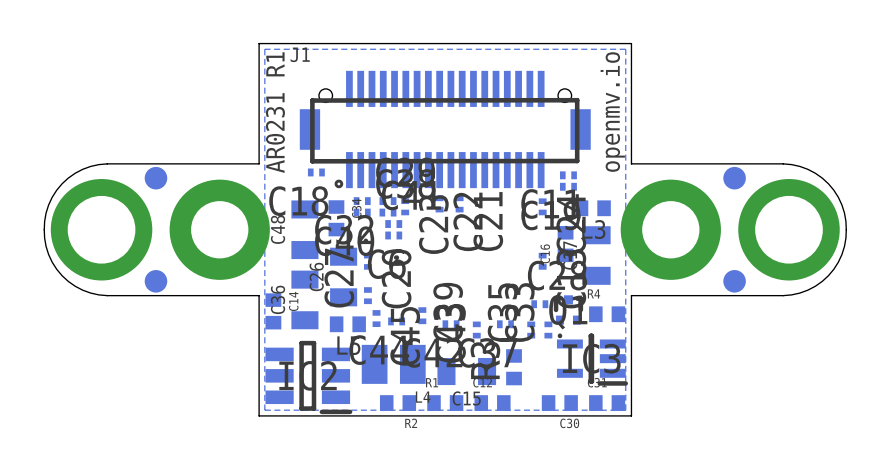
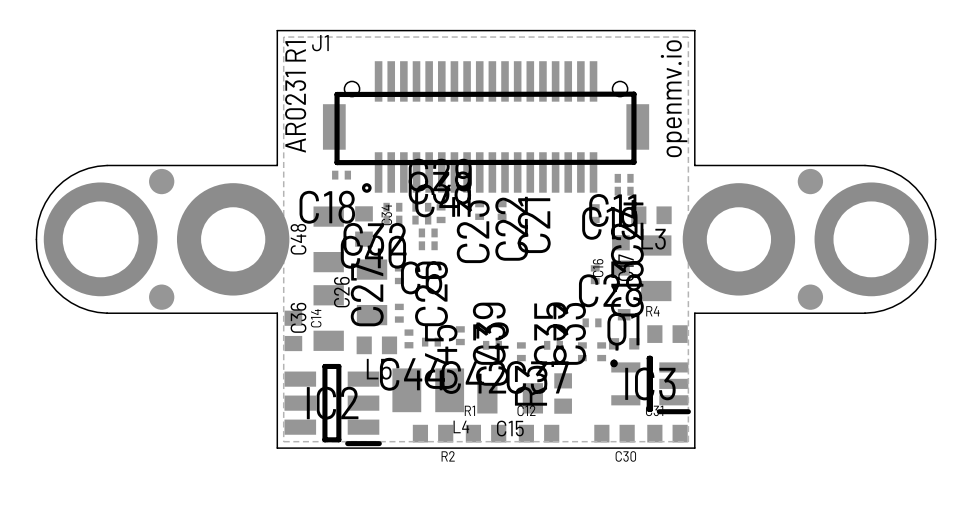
Q1 footprint: [553, 295, 584, 339] -> [608, 309, 640, 368]

